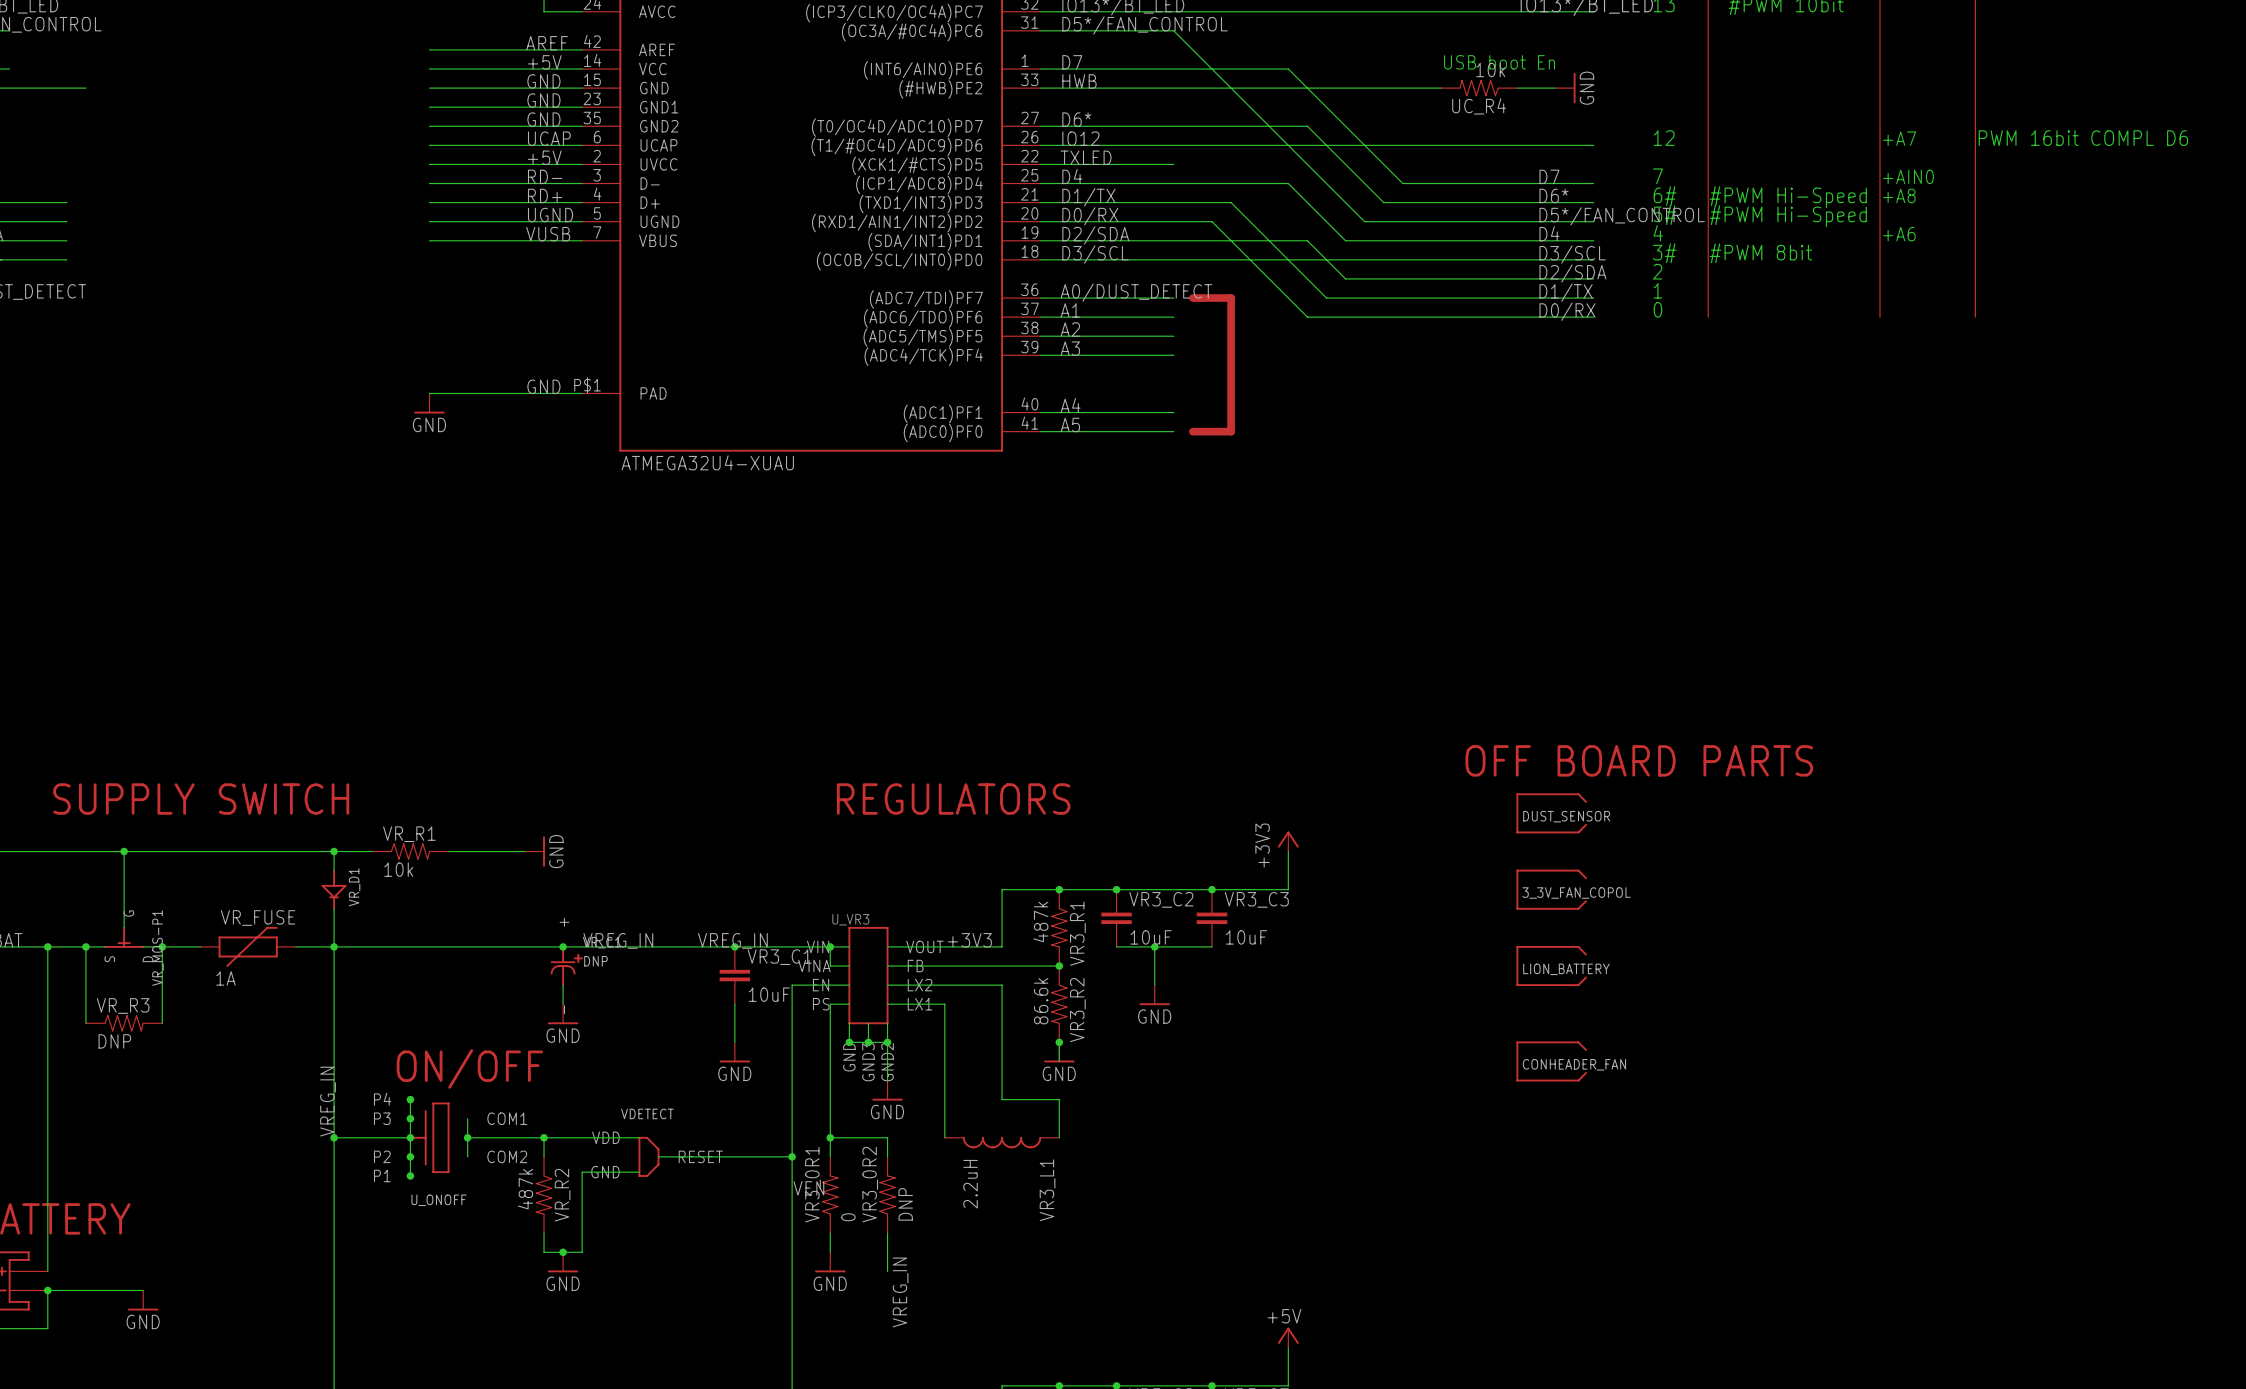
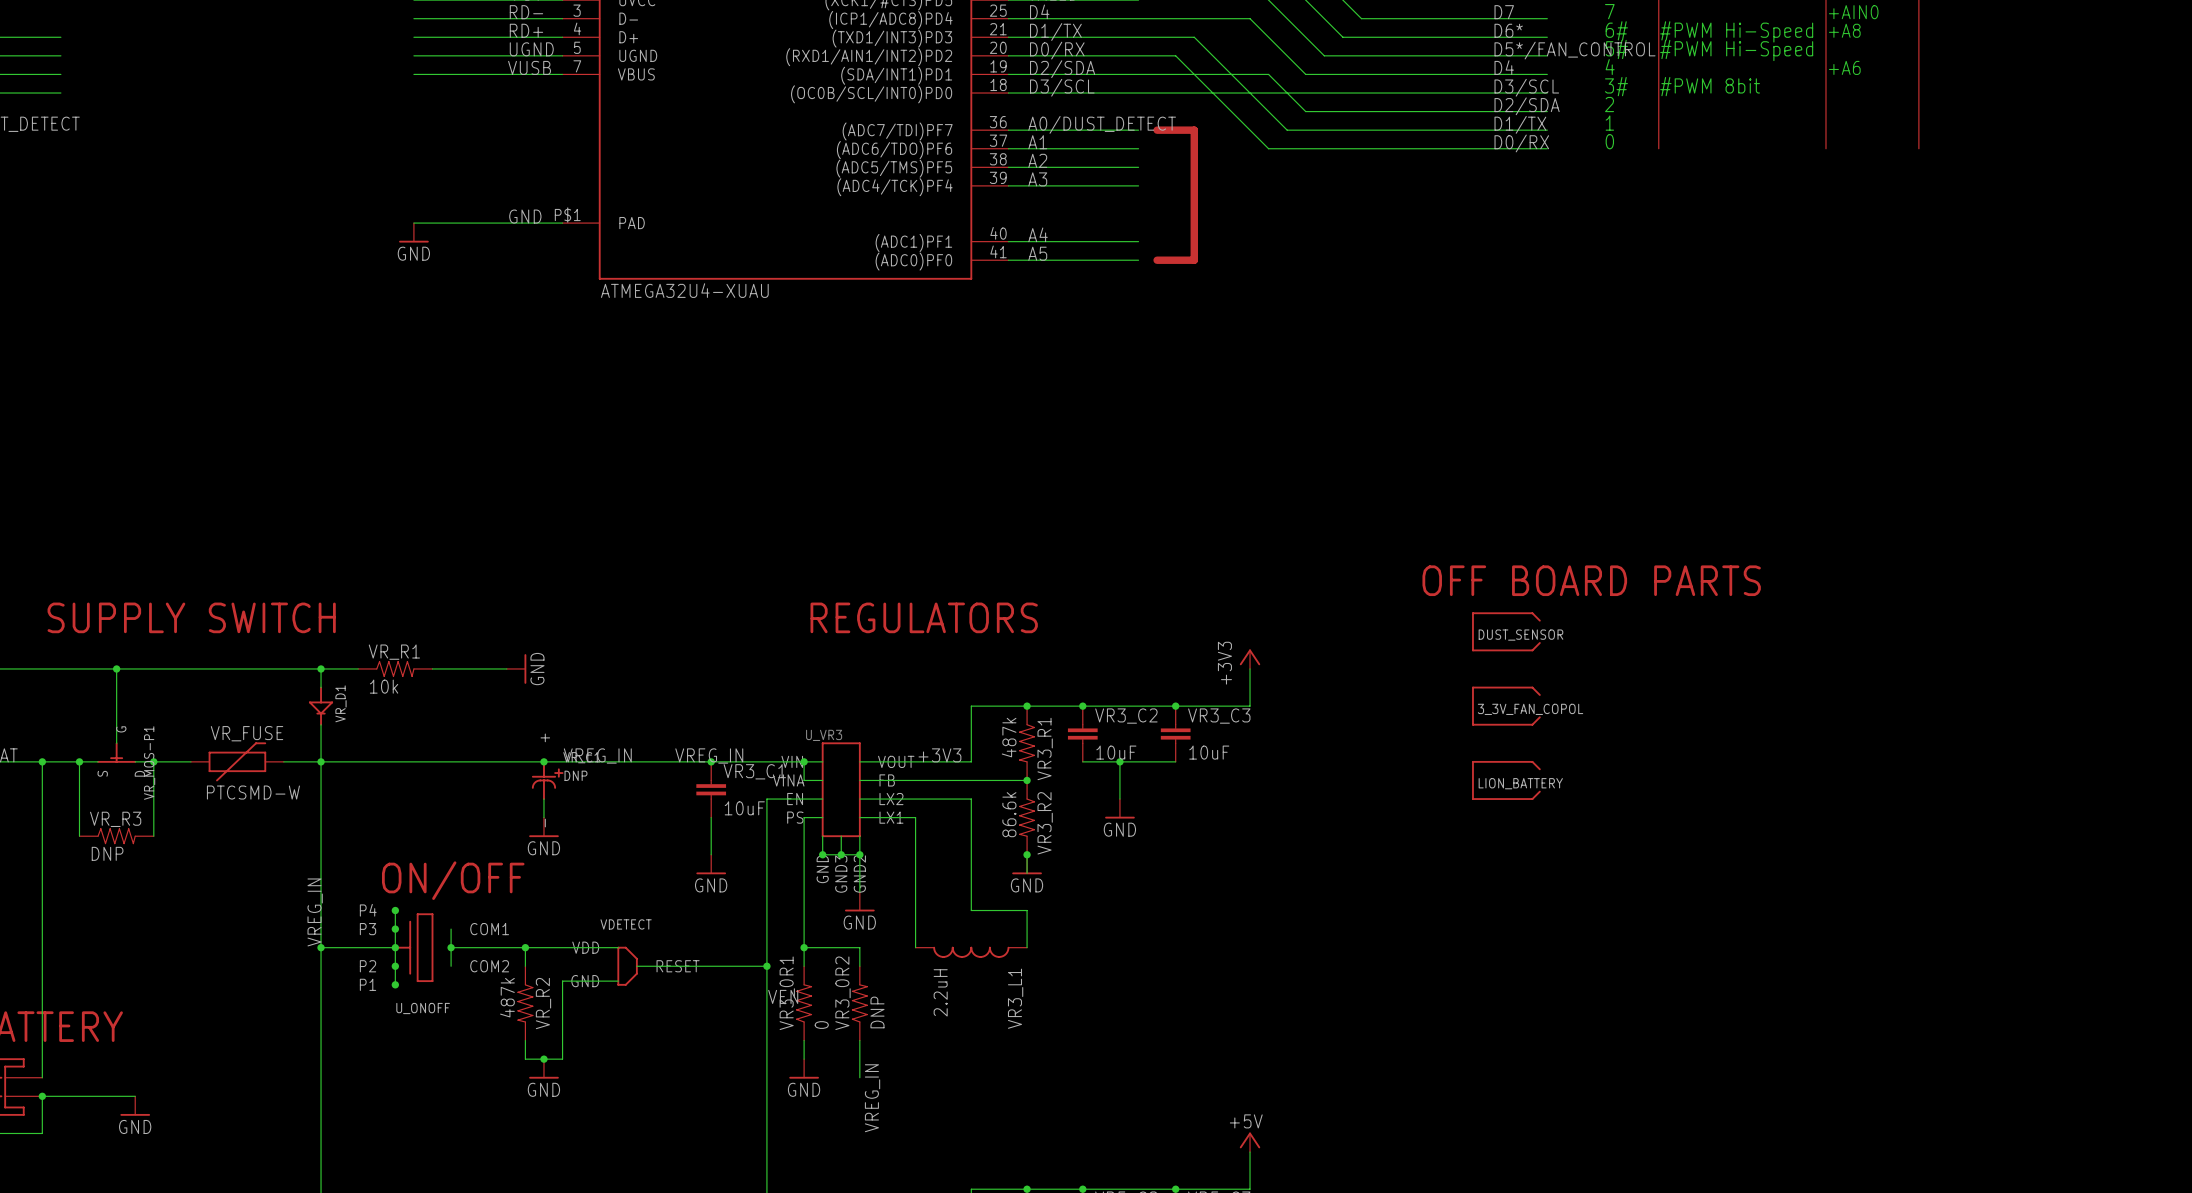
VR_FUSE value: 1A (225, 978) -> PTCSMD-W (253, 792)
CONHEADER_FAN: (1551, 1061) -> none

